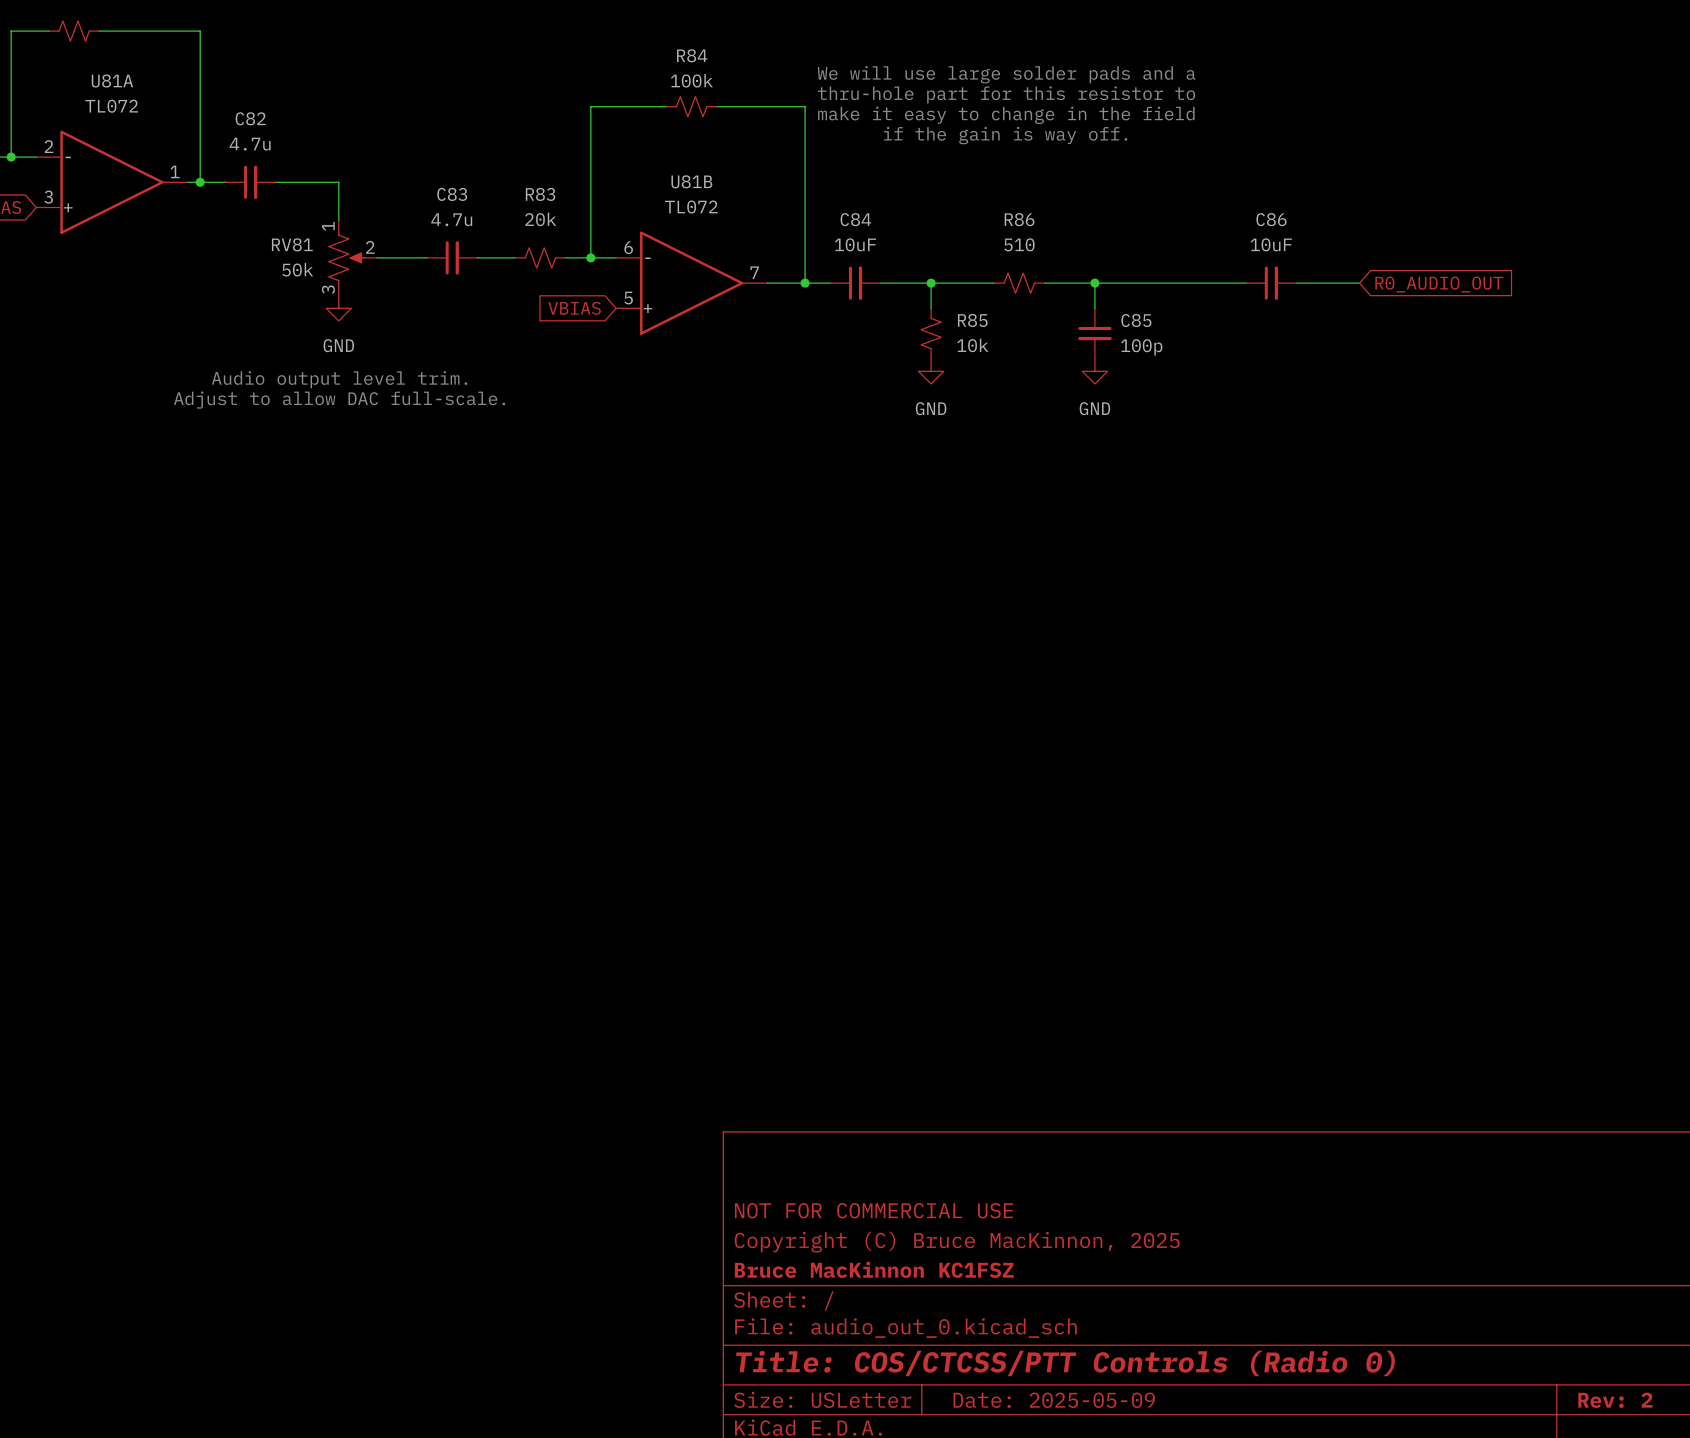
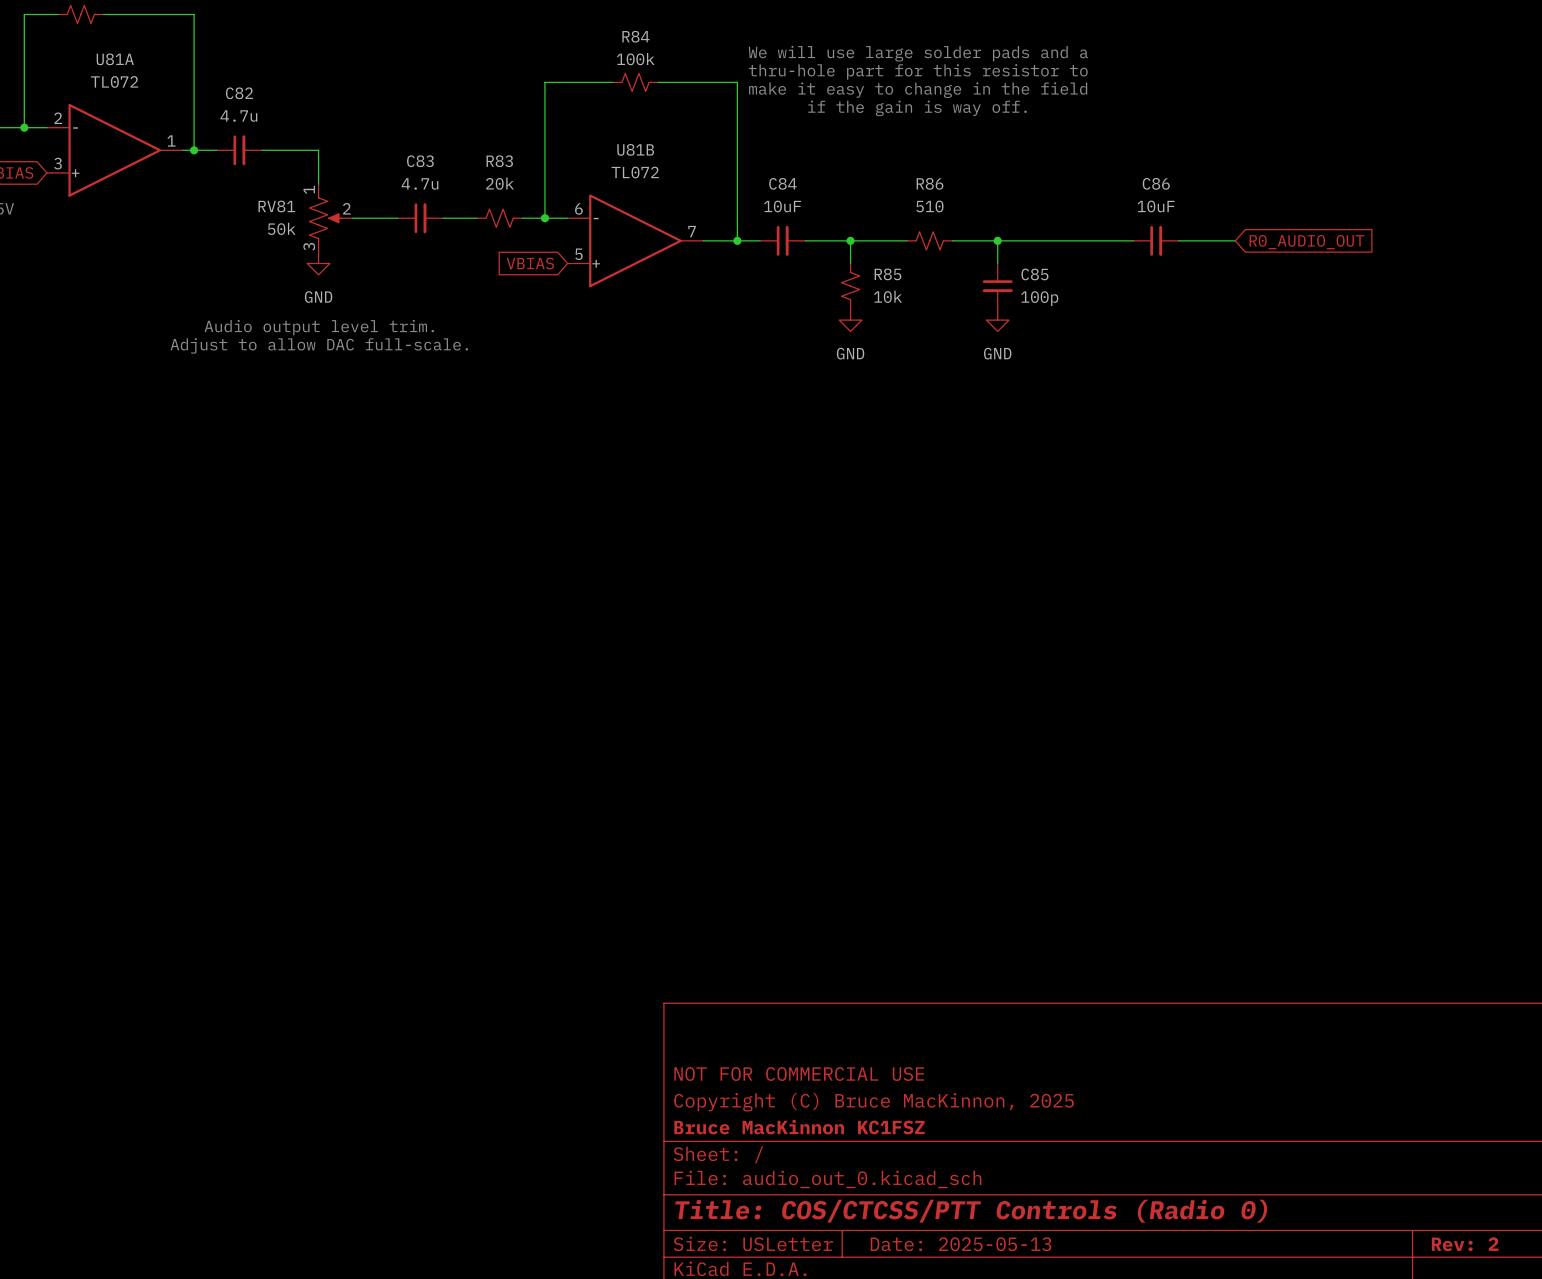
title block: Date: 2025-05-09 (1054, 1400) -> Date: 2025-05-13 (960, 1244)

